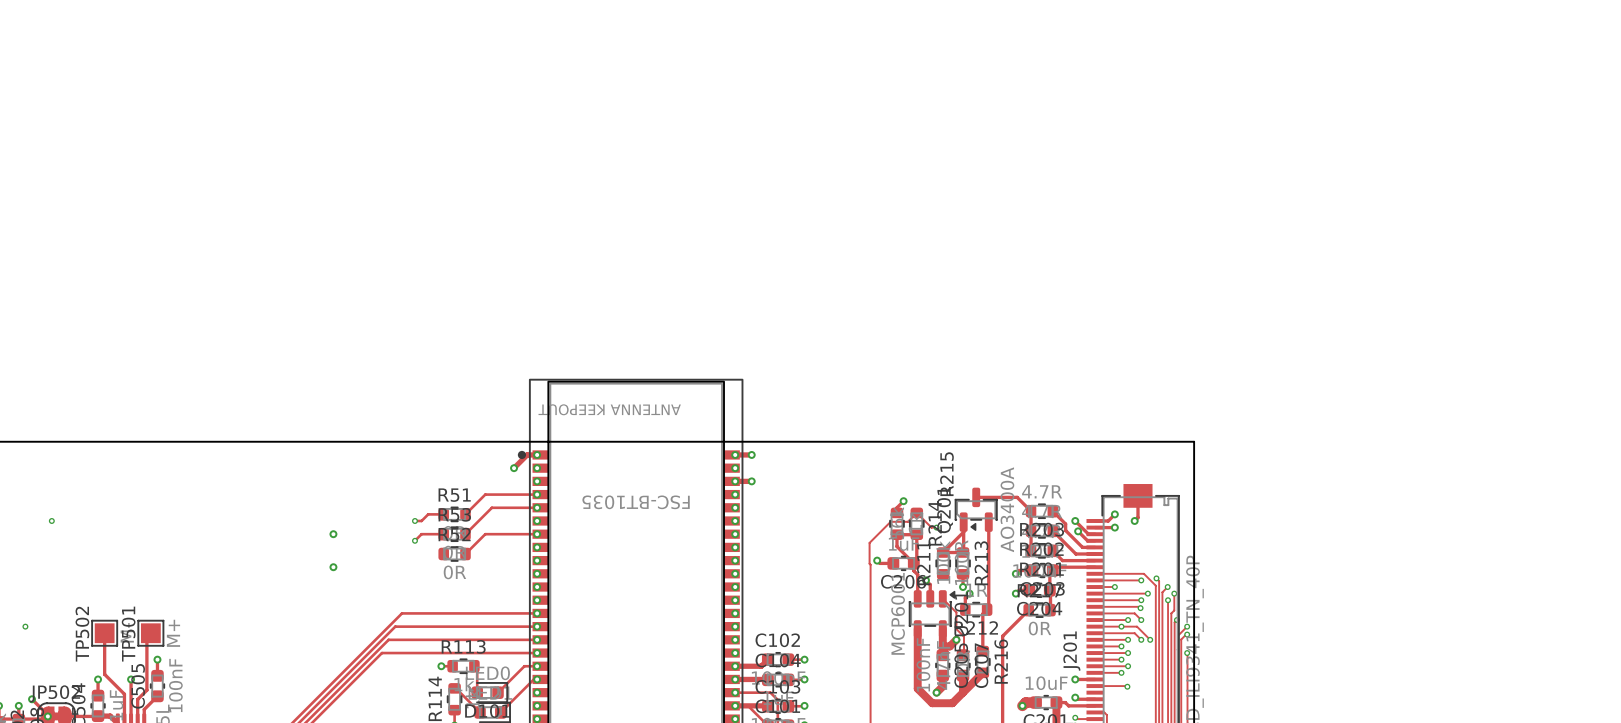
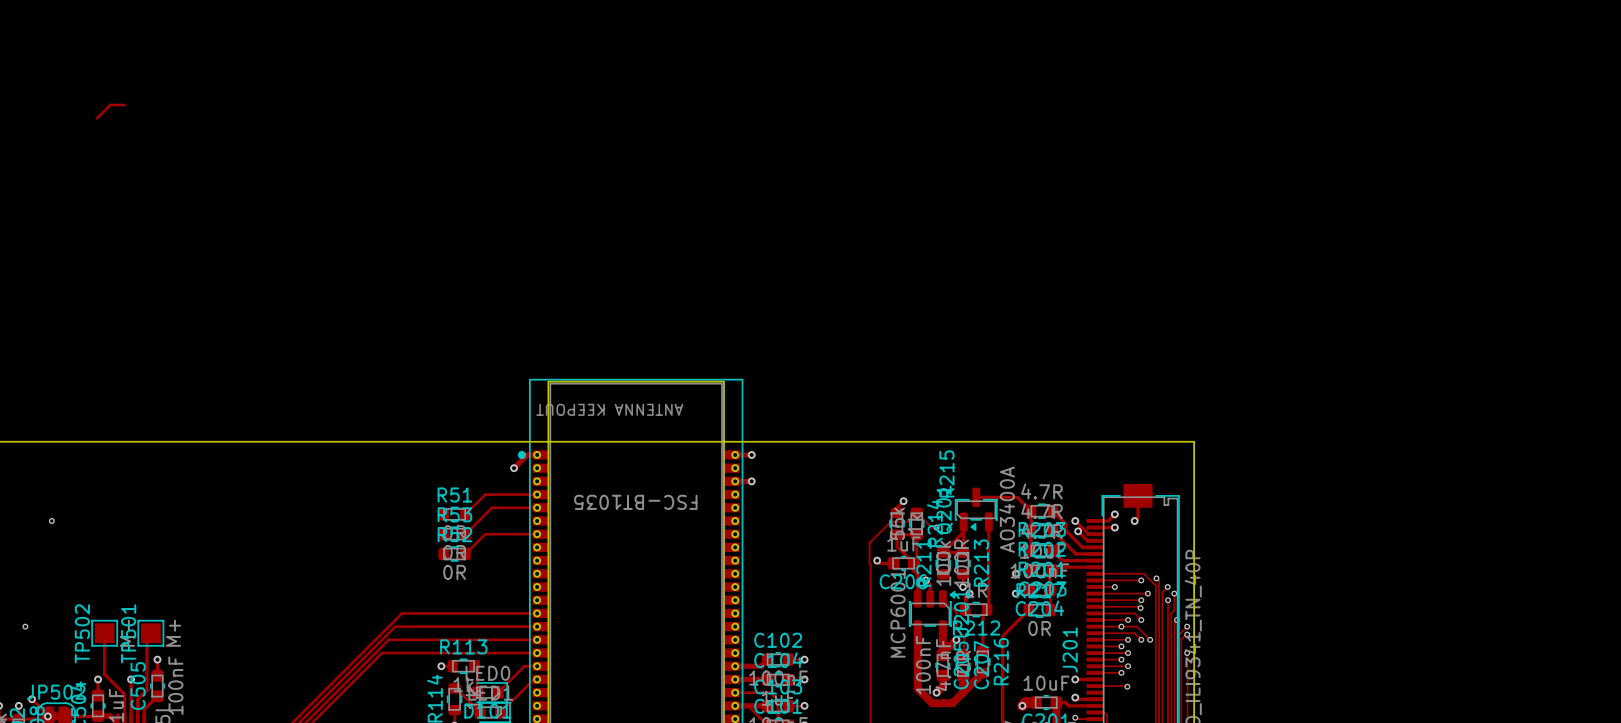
track: none -> (124, 105) (110, 105) (97, 118)
track: (443, 514) (428, 514) (421, 520) (414, 520) -> none
via: (414, 520) -> none
via: (333, 534) -> none
track: (443, 534) (421, 534) (414, 540) -> none
via: (414, 540) -> none
via: (333, 567) -> none

